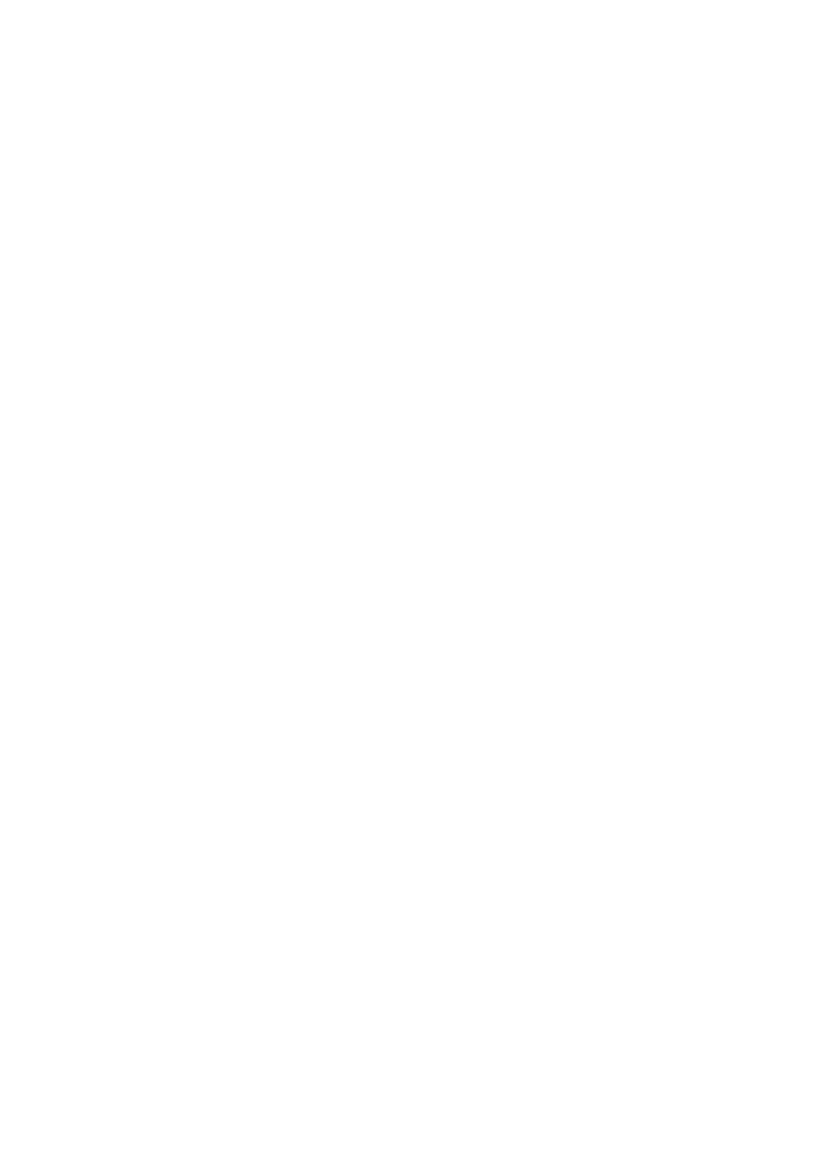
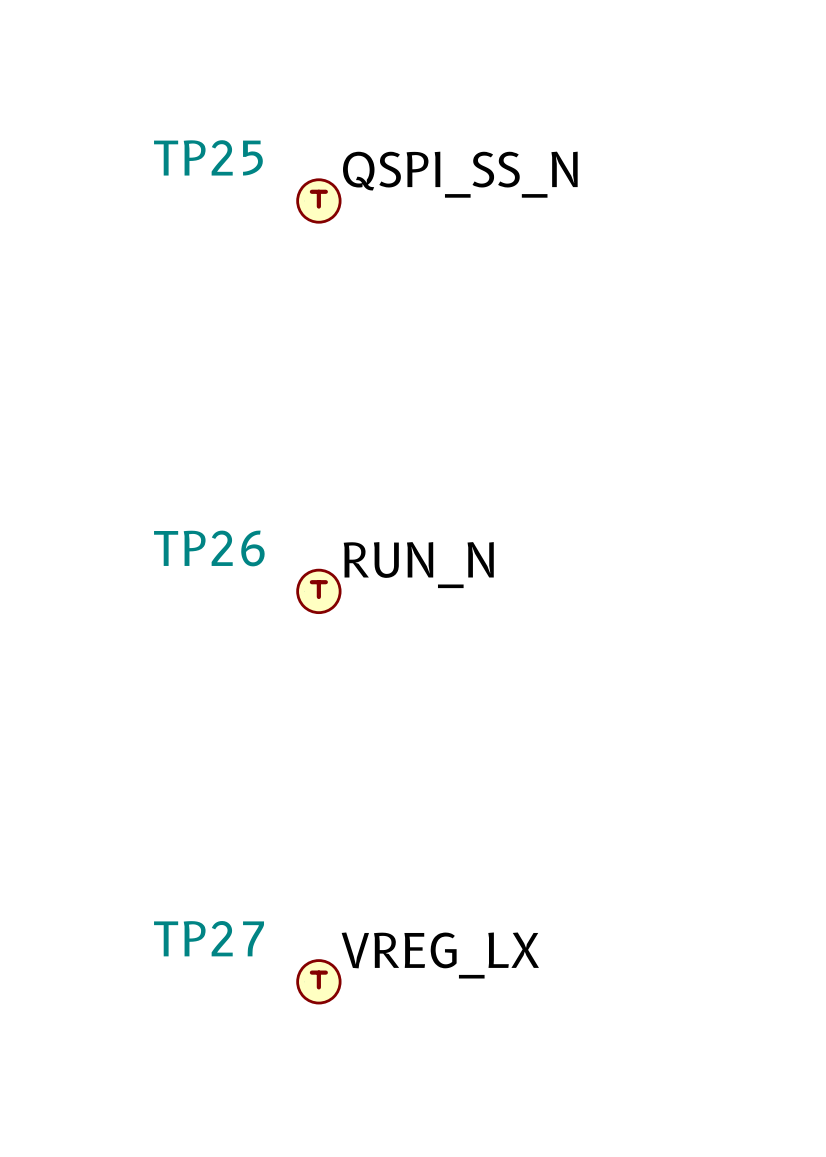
label: none -> QSPI_SS_N (460, 174)
TP25: none -> (318, 200)
label: none -> RUN_N (418, 565)
TP26: none -> (318, 591)
label: none -> VREG_LX (440, 955)
TP27: none -> (318, 981)

